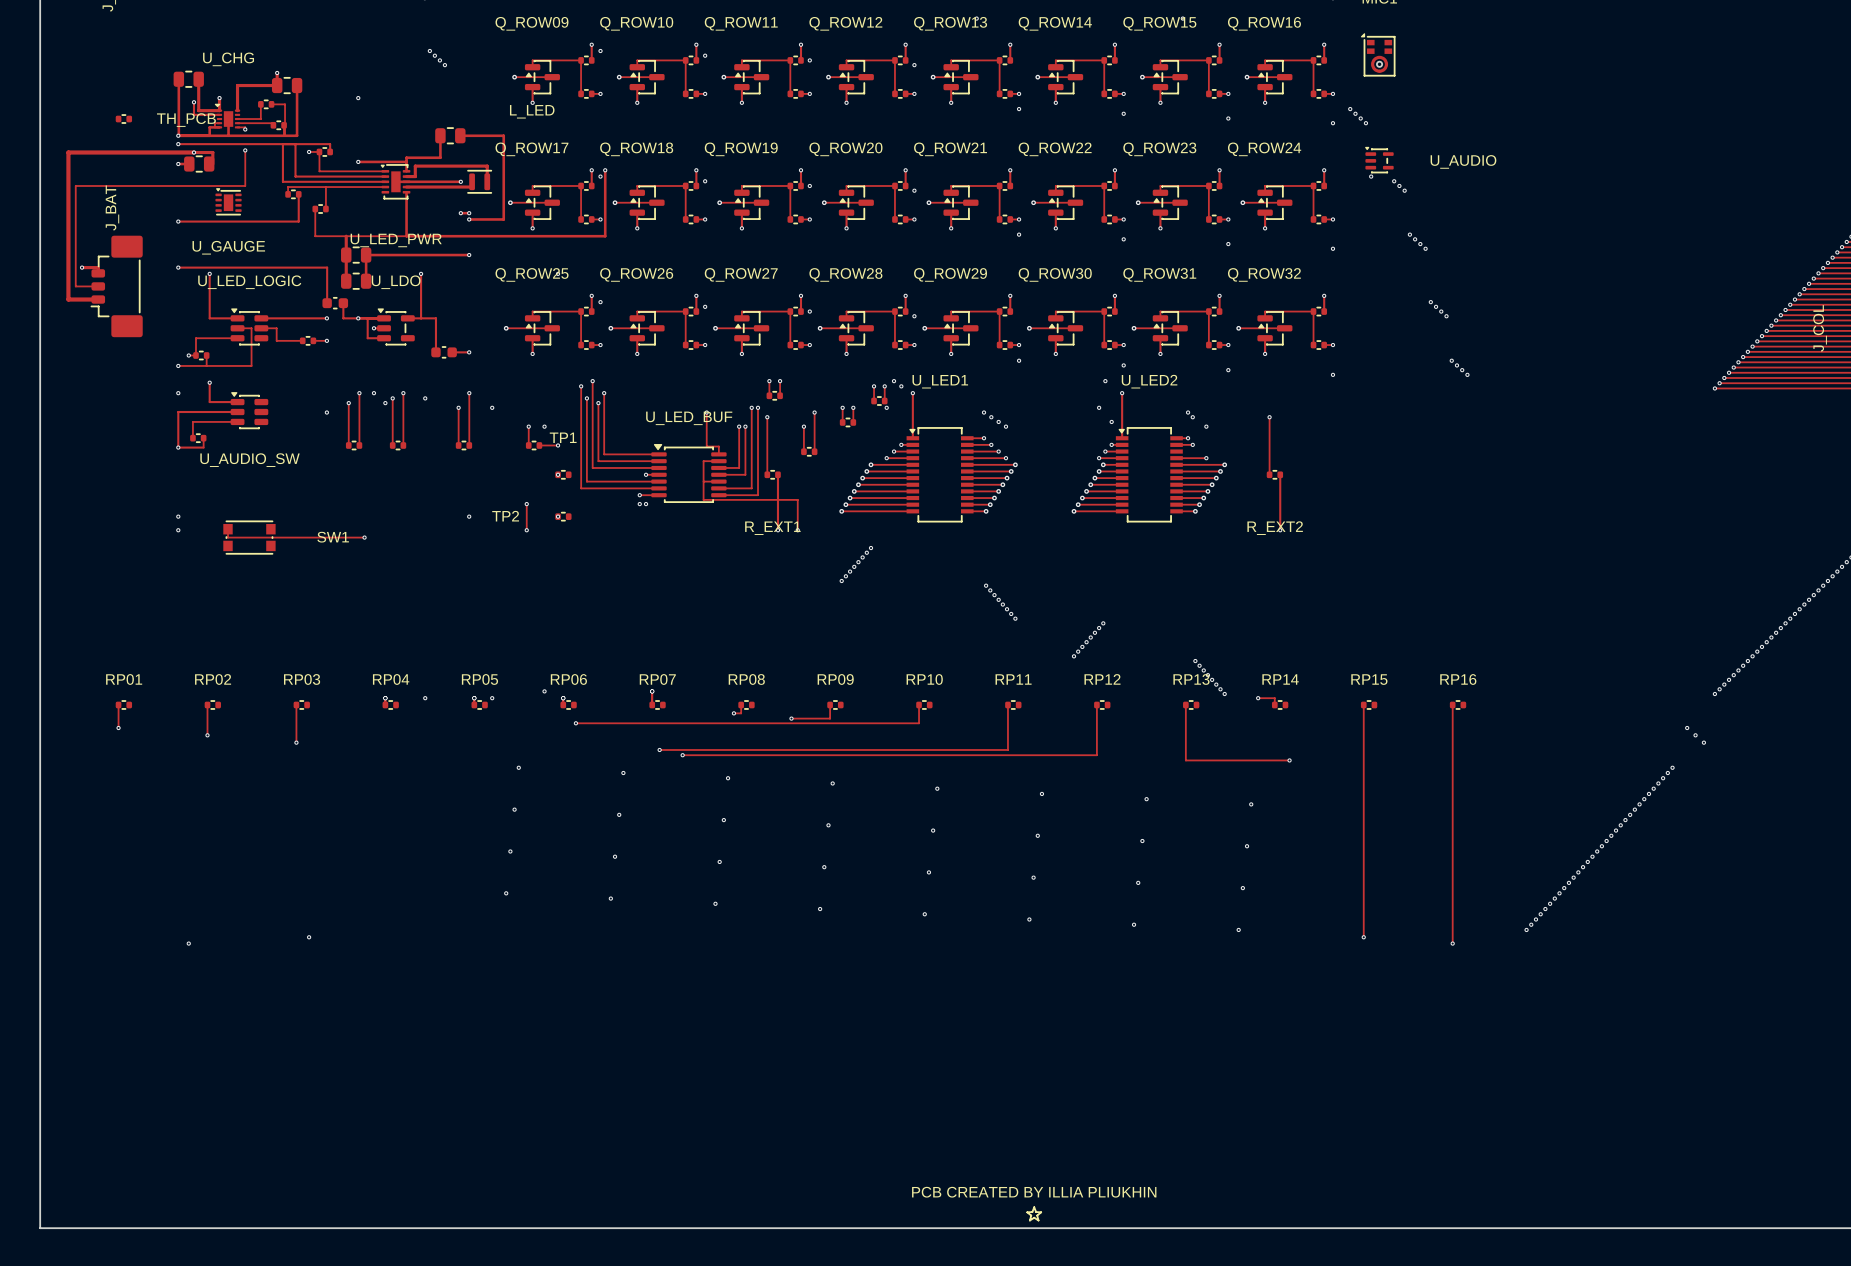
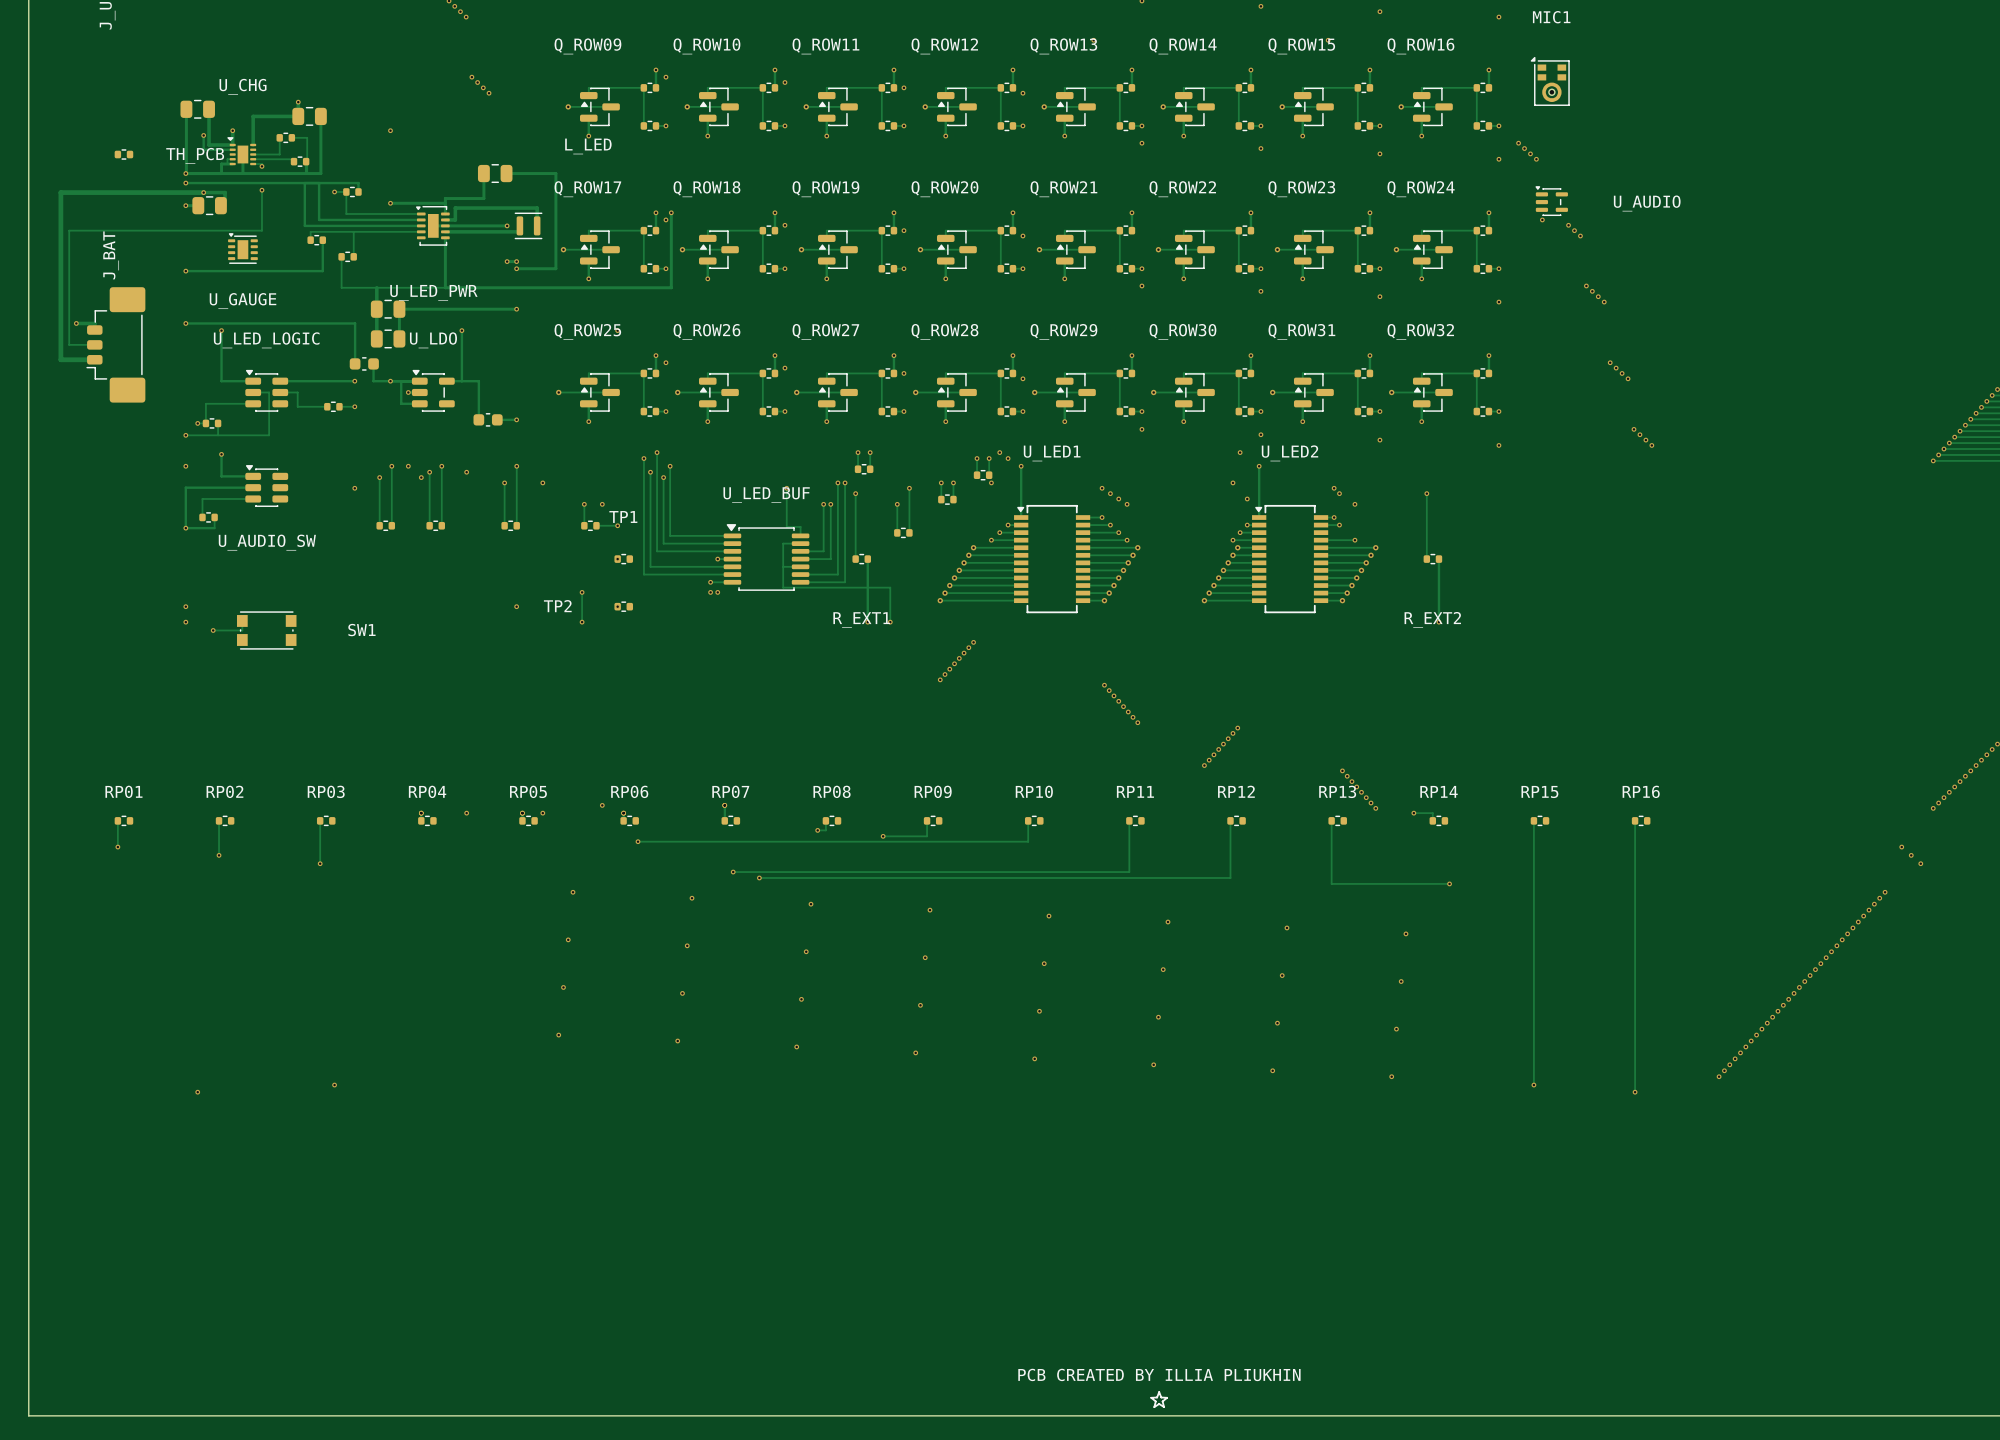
via: none -> (213, 630)
track: (228, 537) (364, 537) -> (242, 630) (213, 630)
via: (364, 537) -> none

